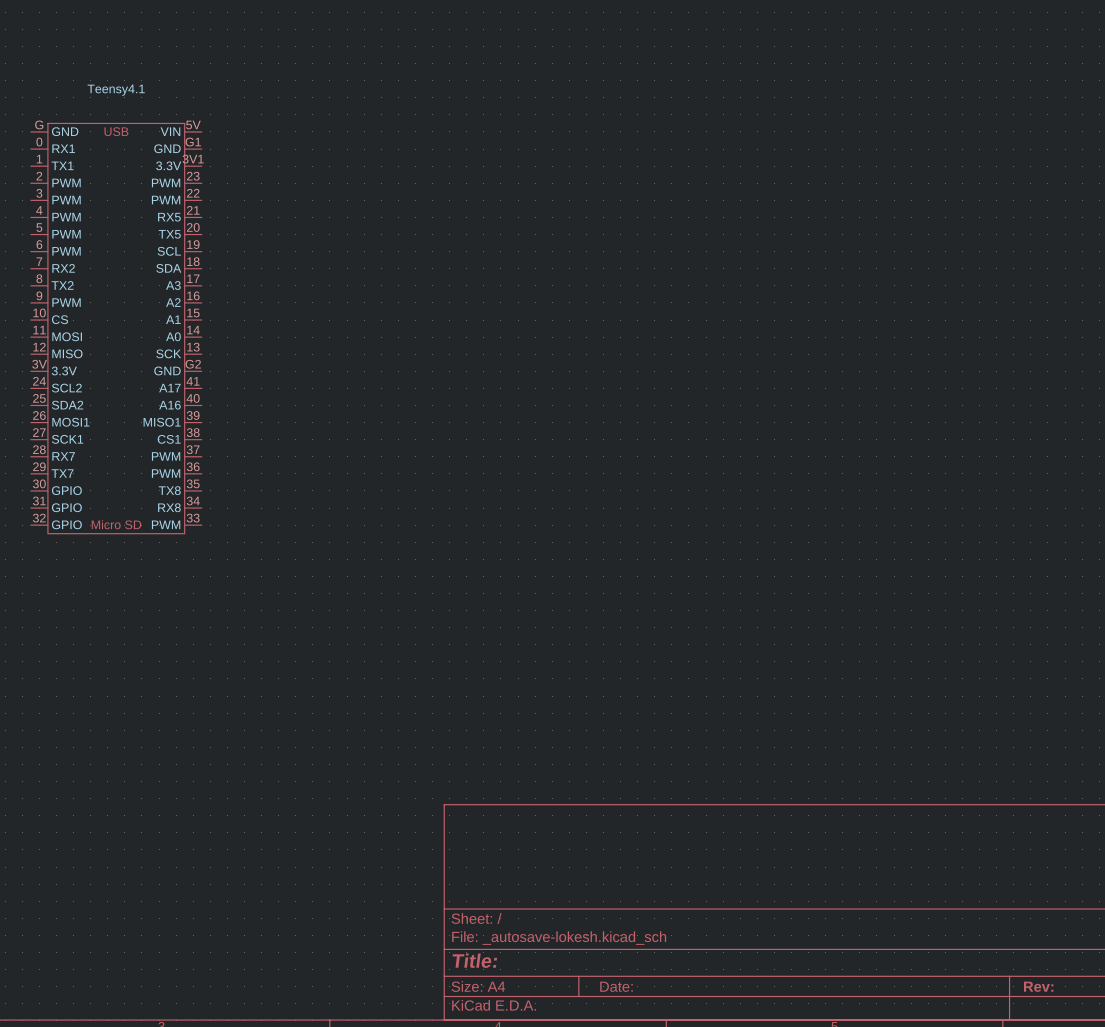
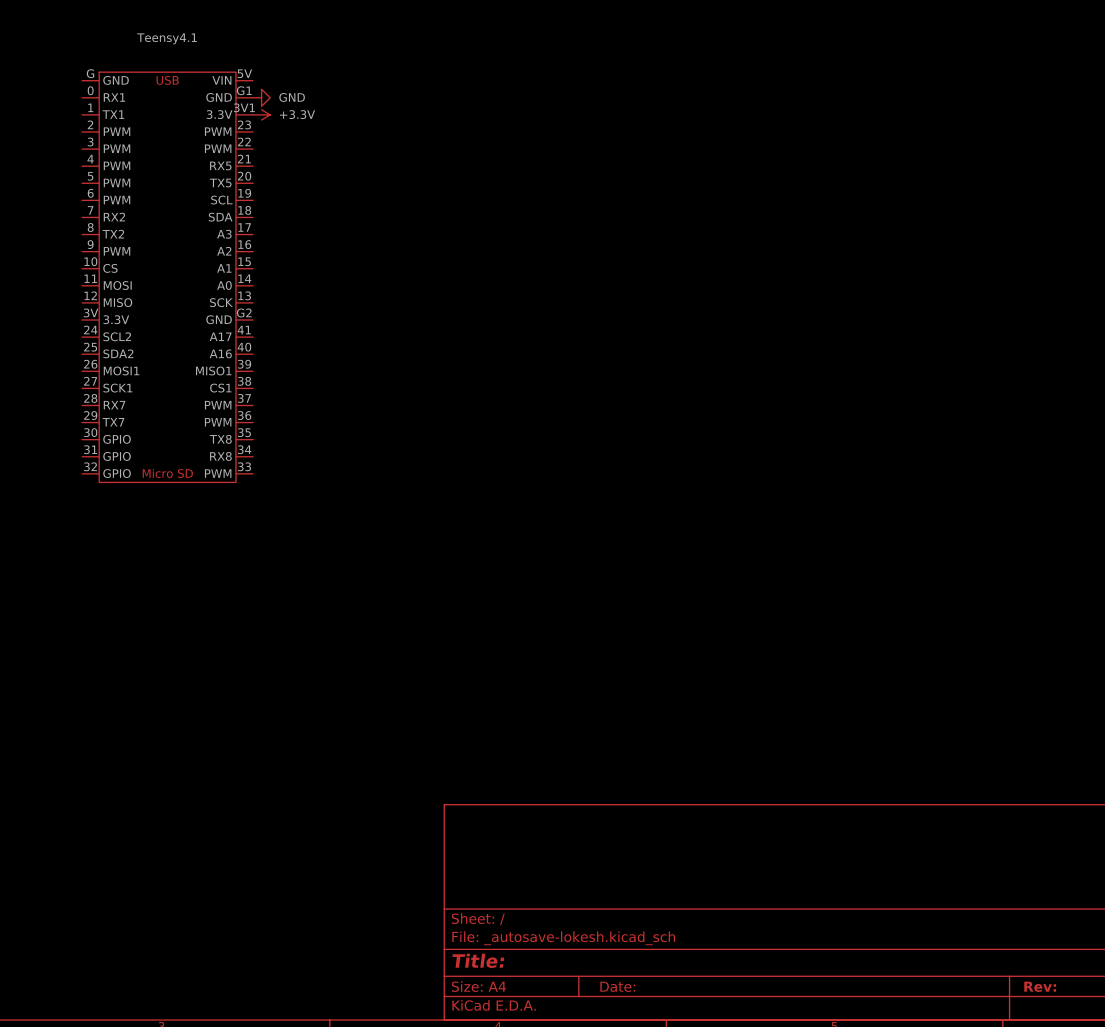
power symbol: none -> GND (261, 97)
power symbol: none -> +3.3V (261, 114)
Teensy4.1 position: (116, 328) -> (167, 277)

